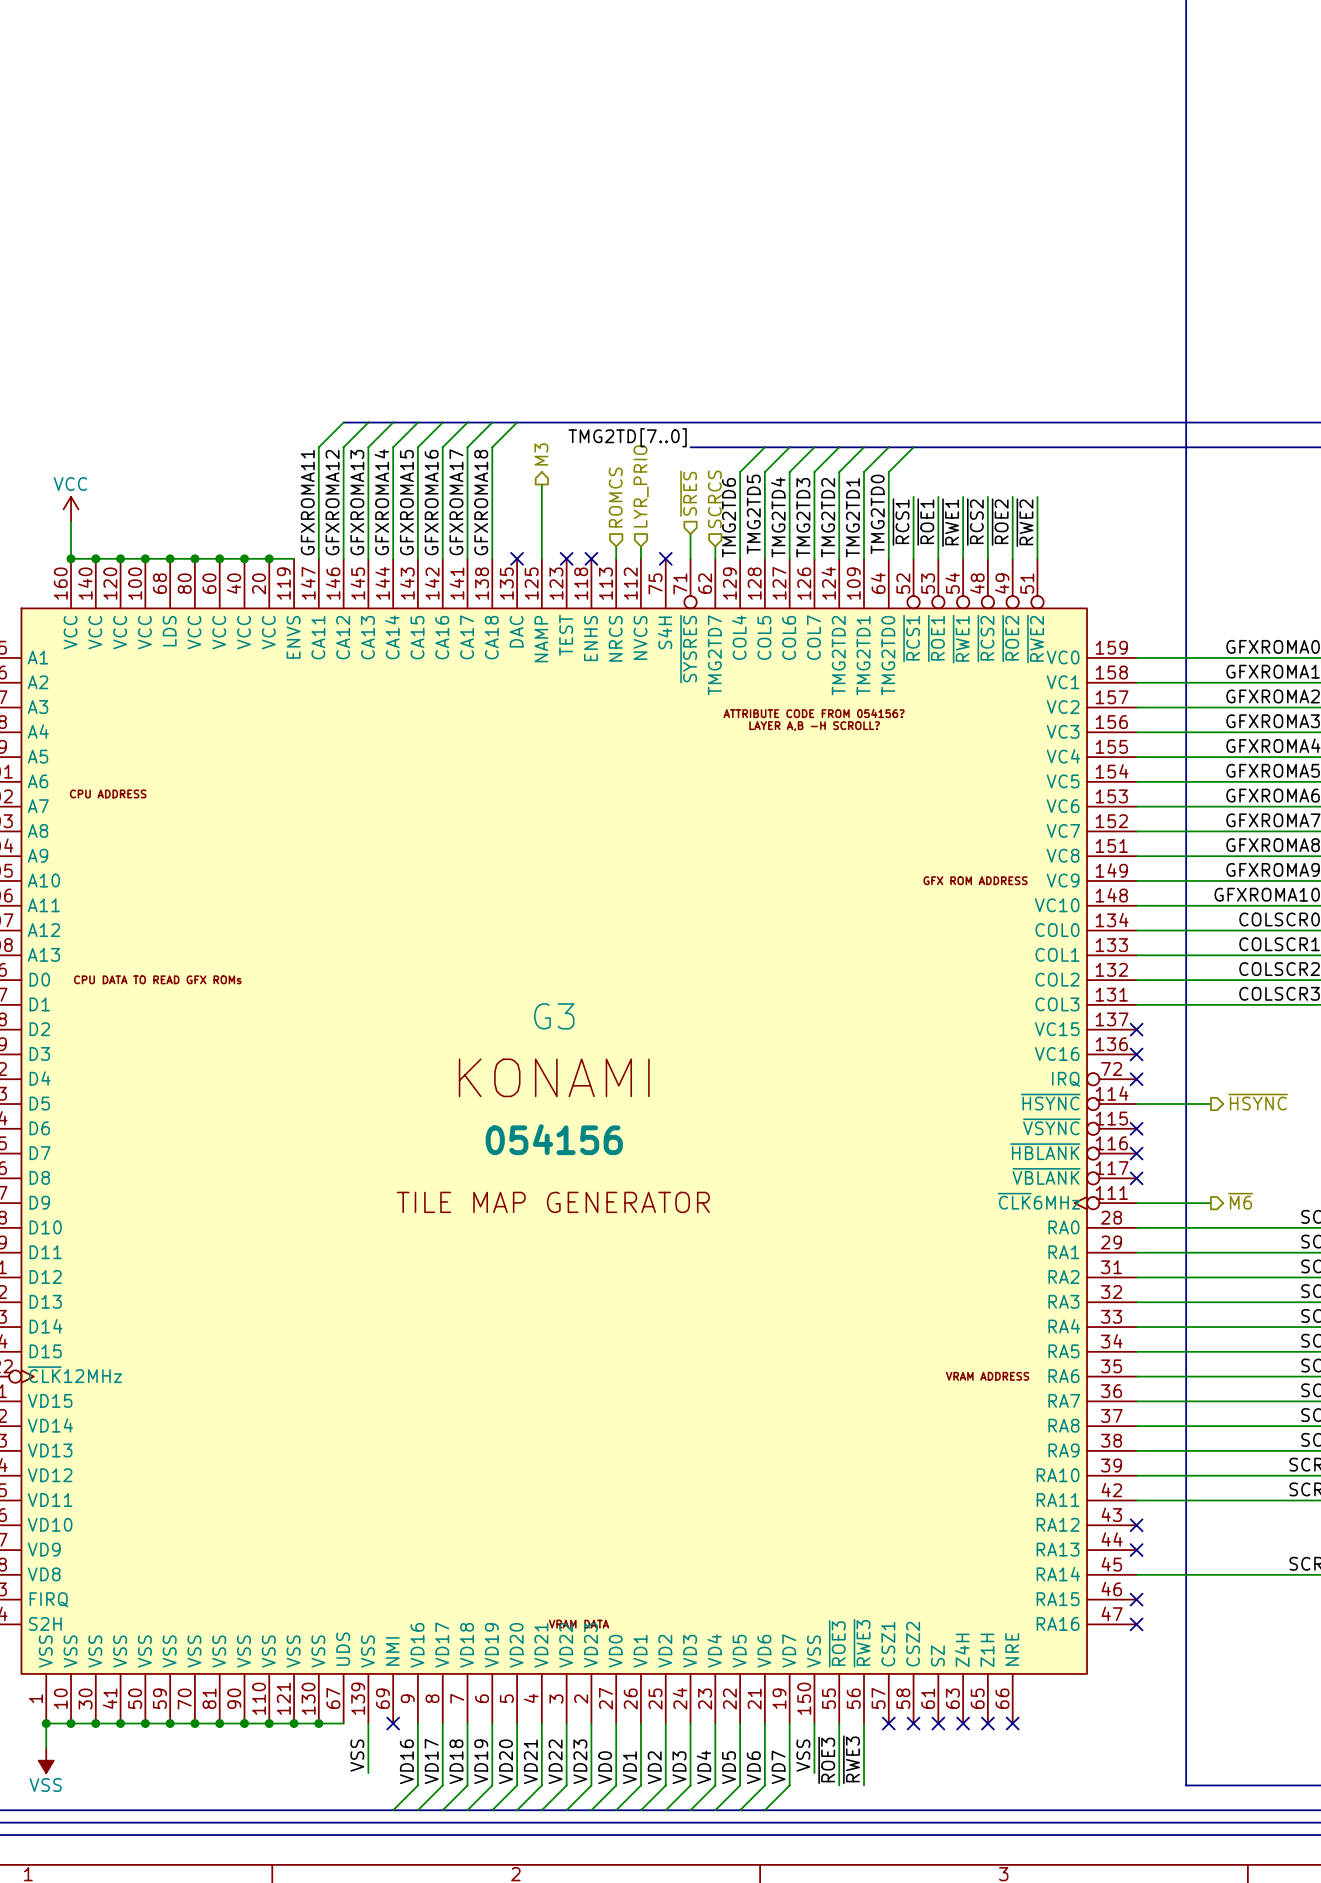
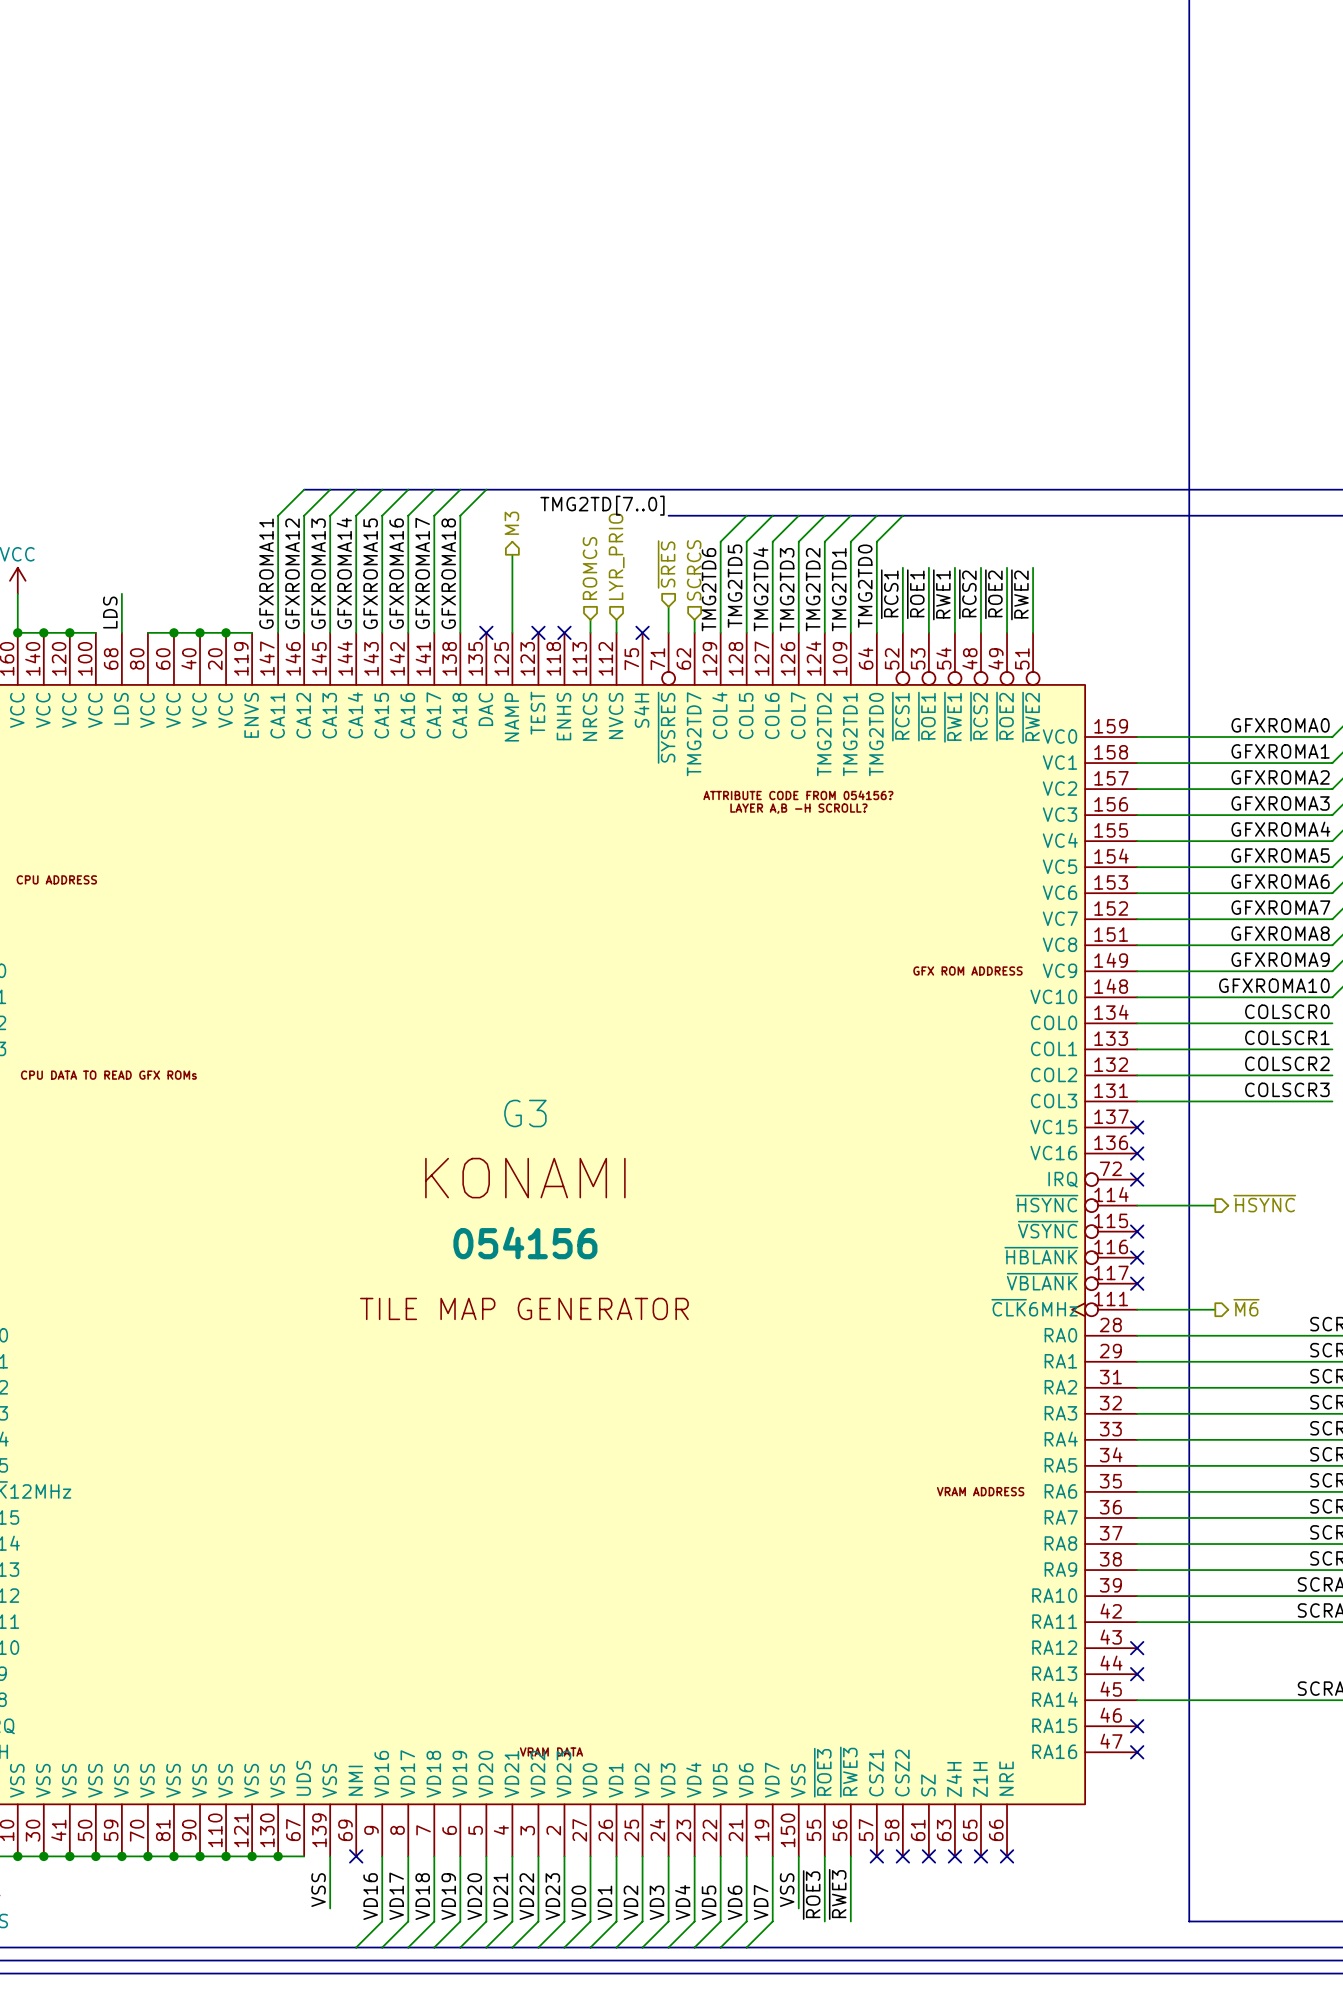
wire: none -> (121, 593) (121, 632)
label: none -> LDS (110, 612)
wire: (145, 558) (194, 558) -> none
junction: (145, 558) -> none
junction: (170, 558) -> none
junction: (194, 558) -> none

